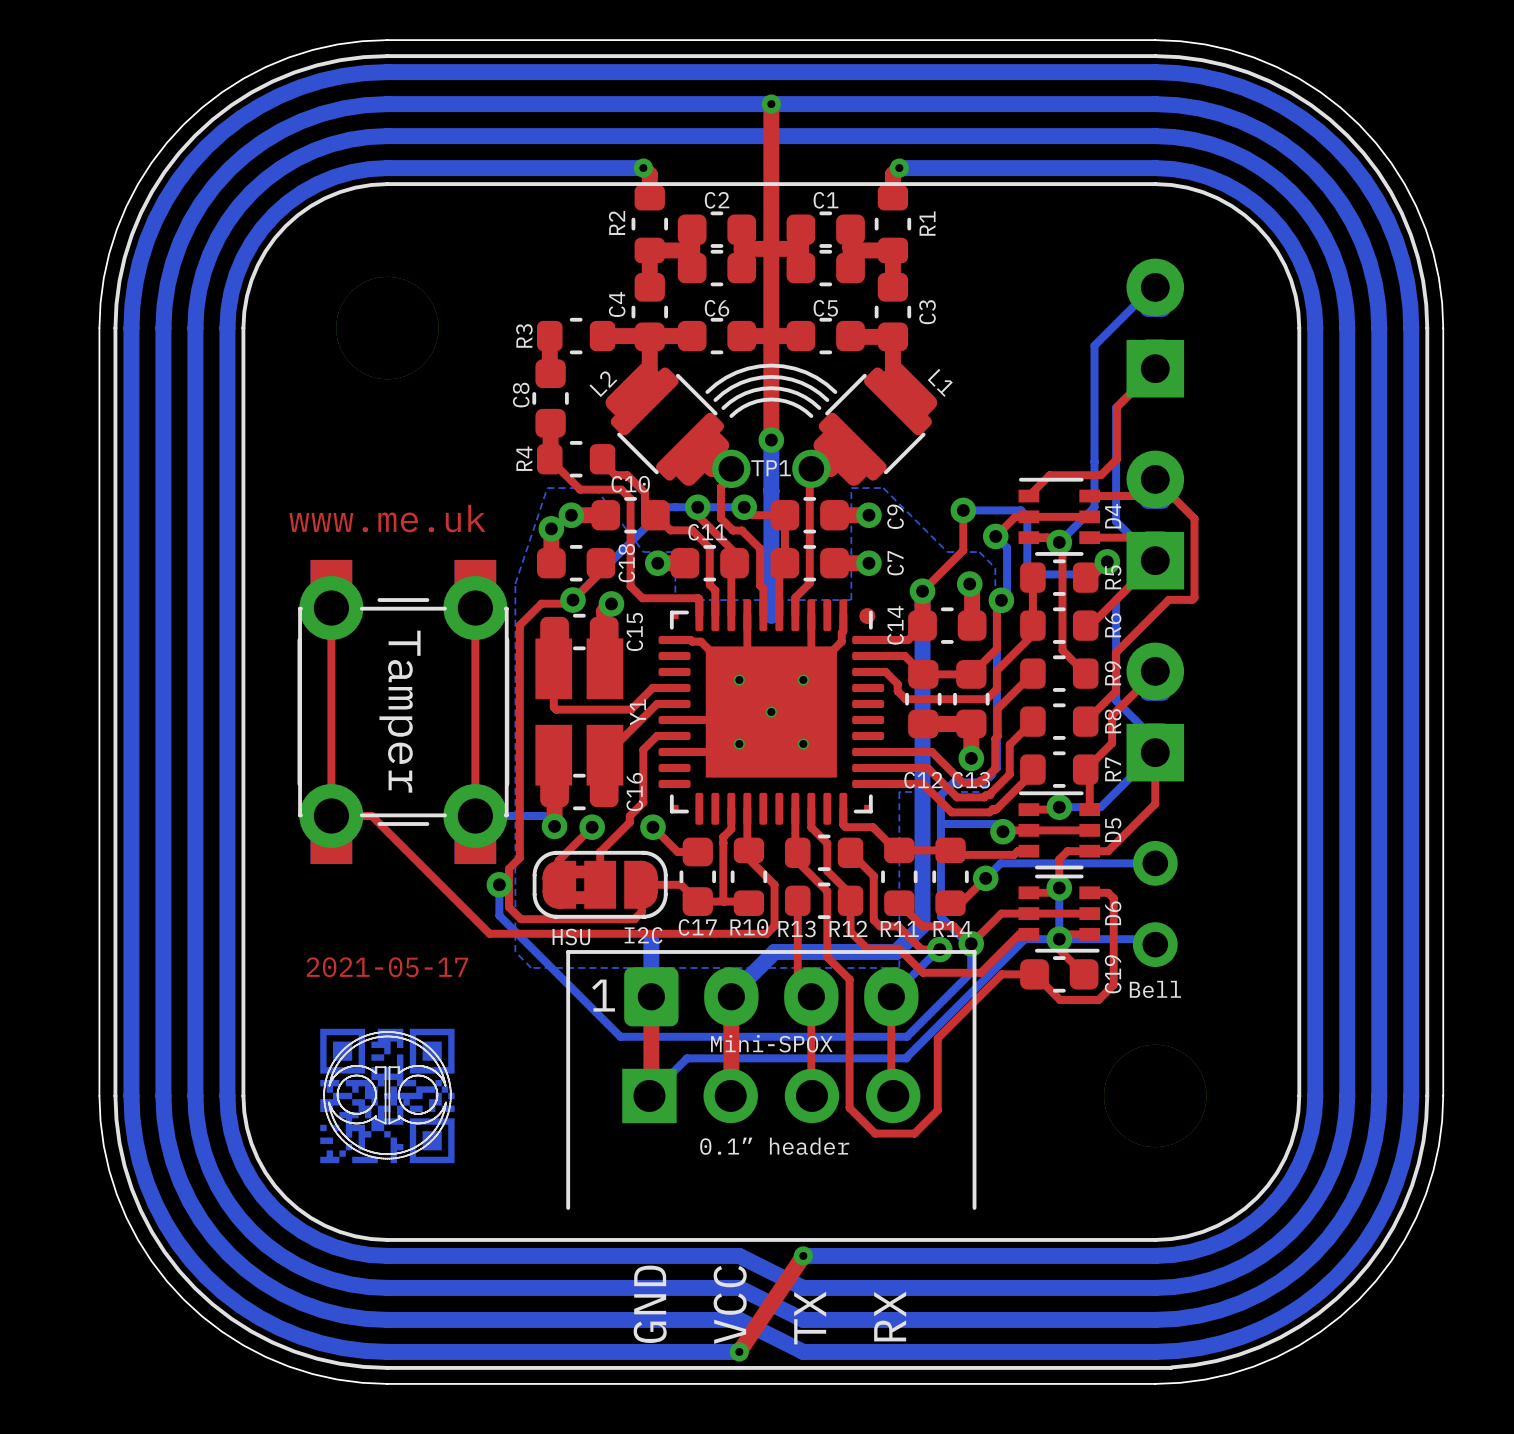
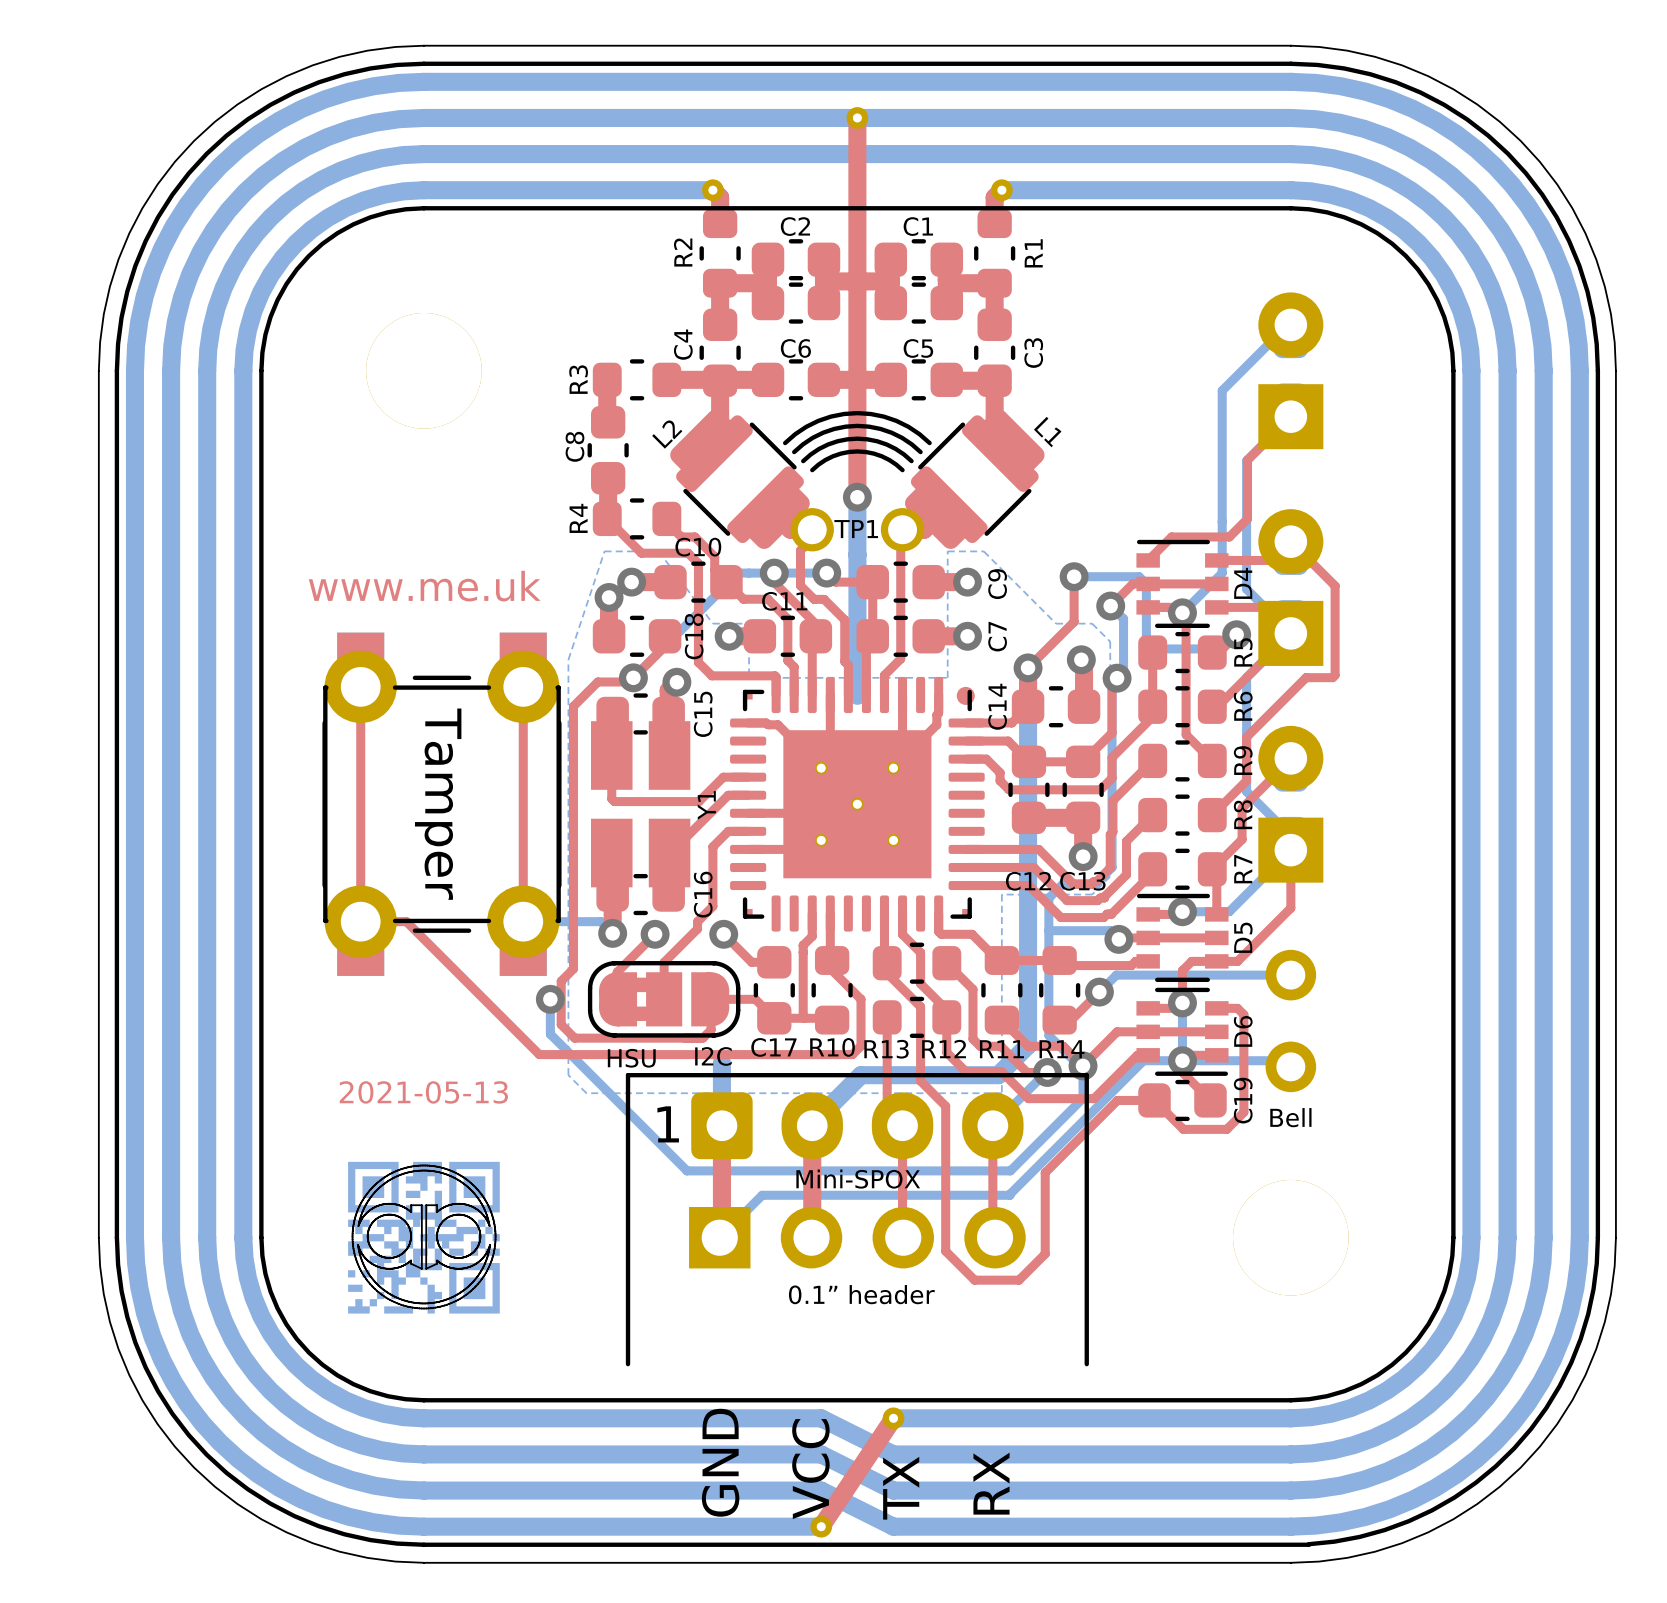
text: 2021-05-17 (387, 967) -> 2021-05-13 (423, 1092)

